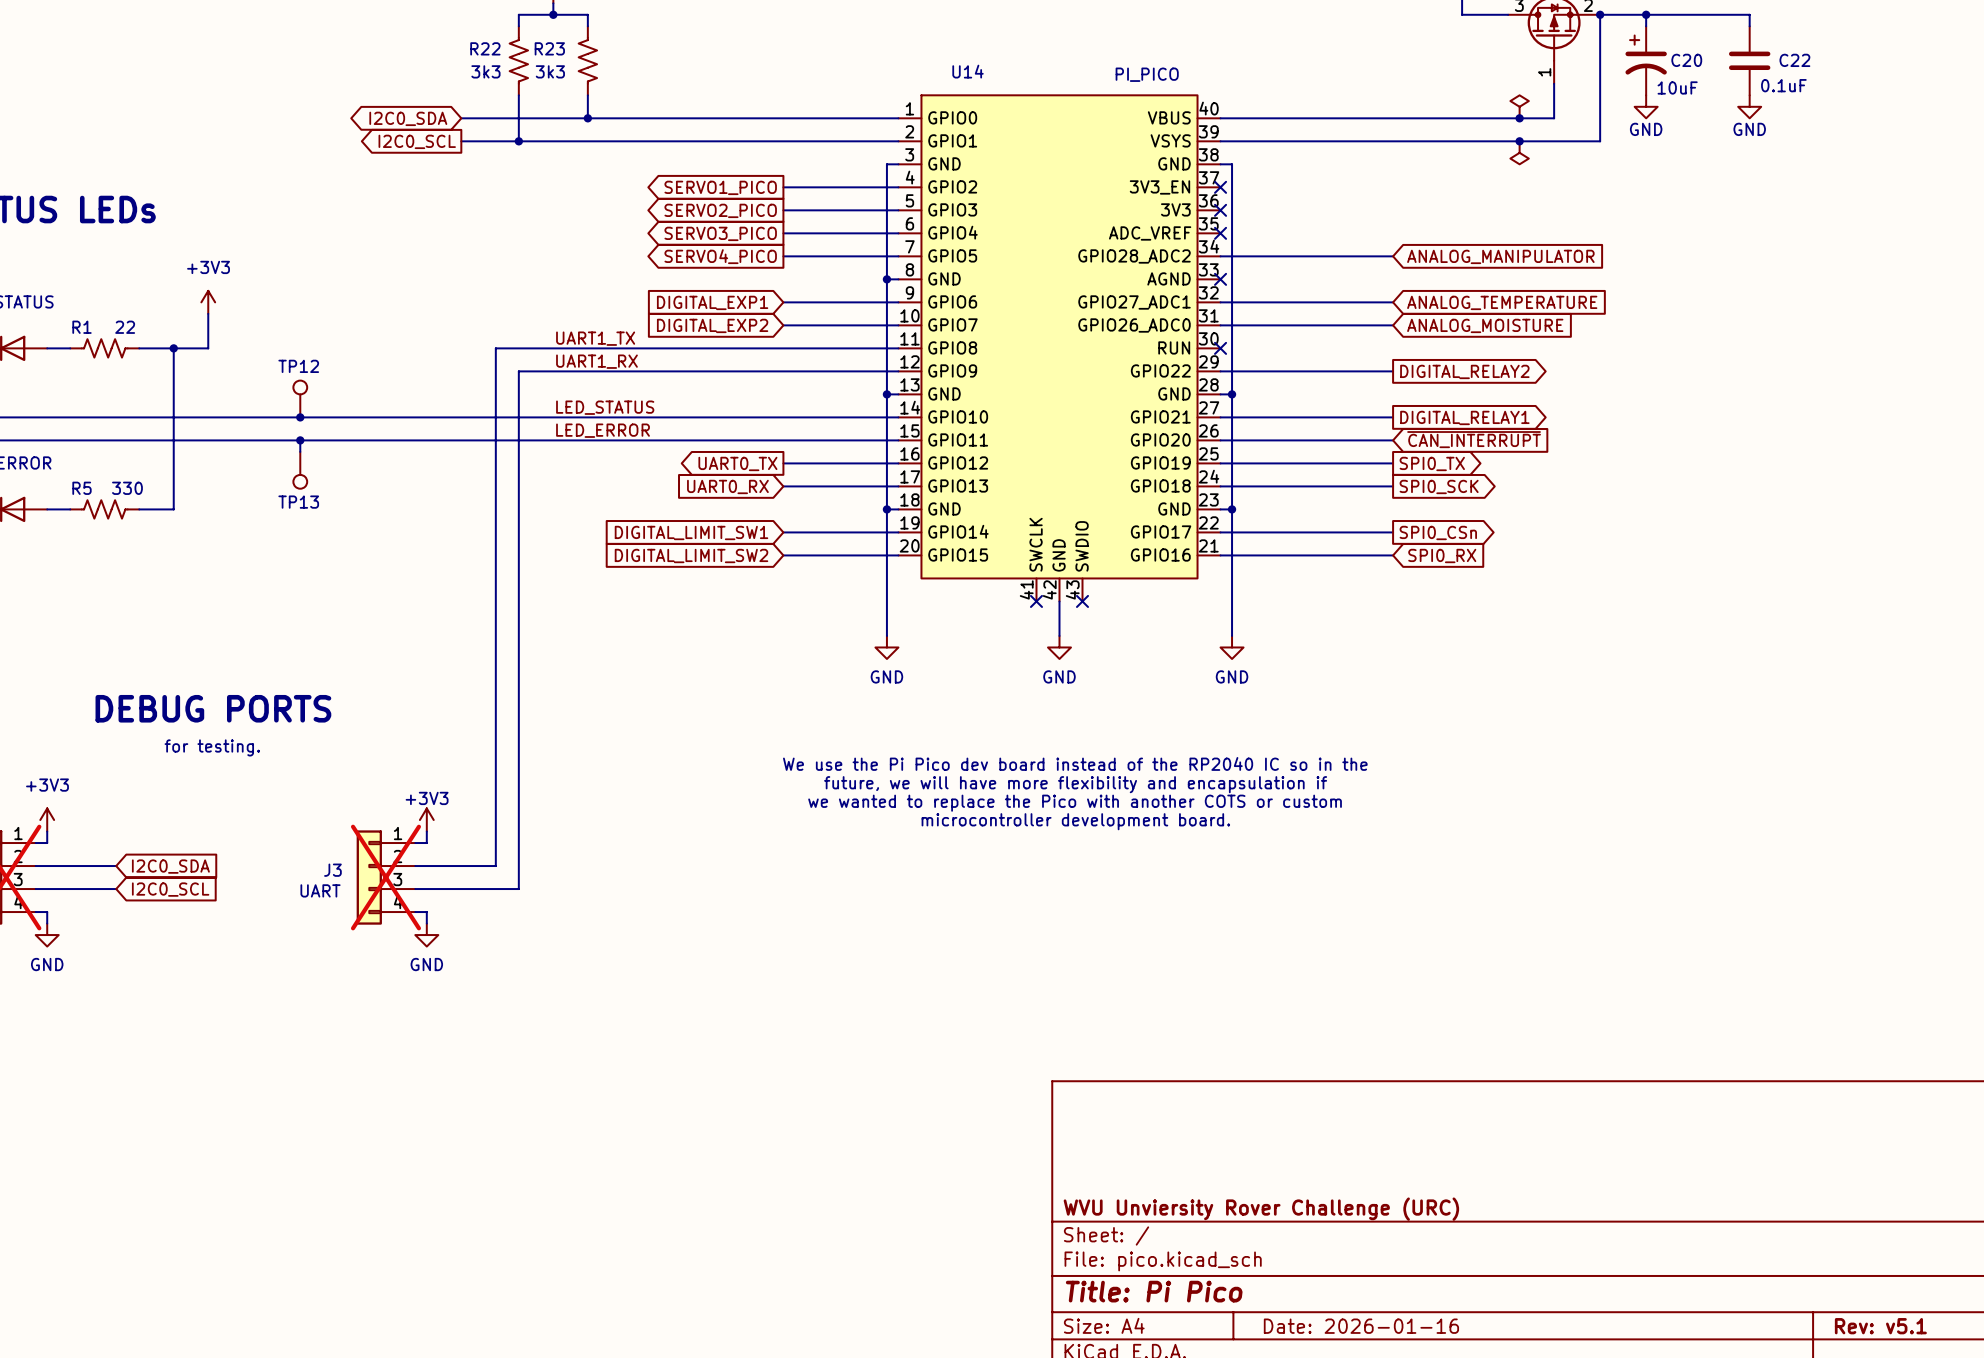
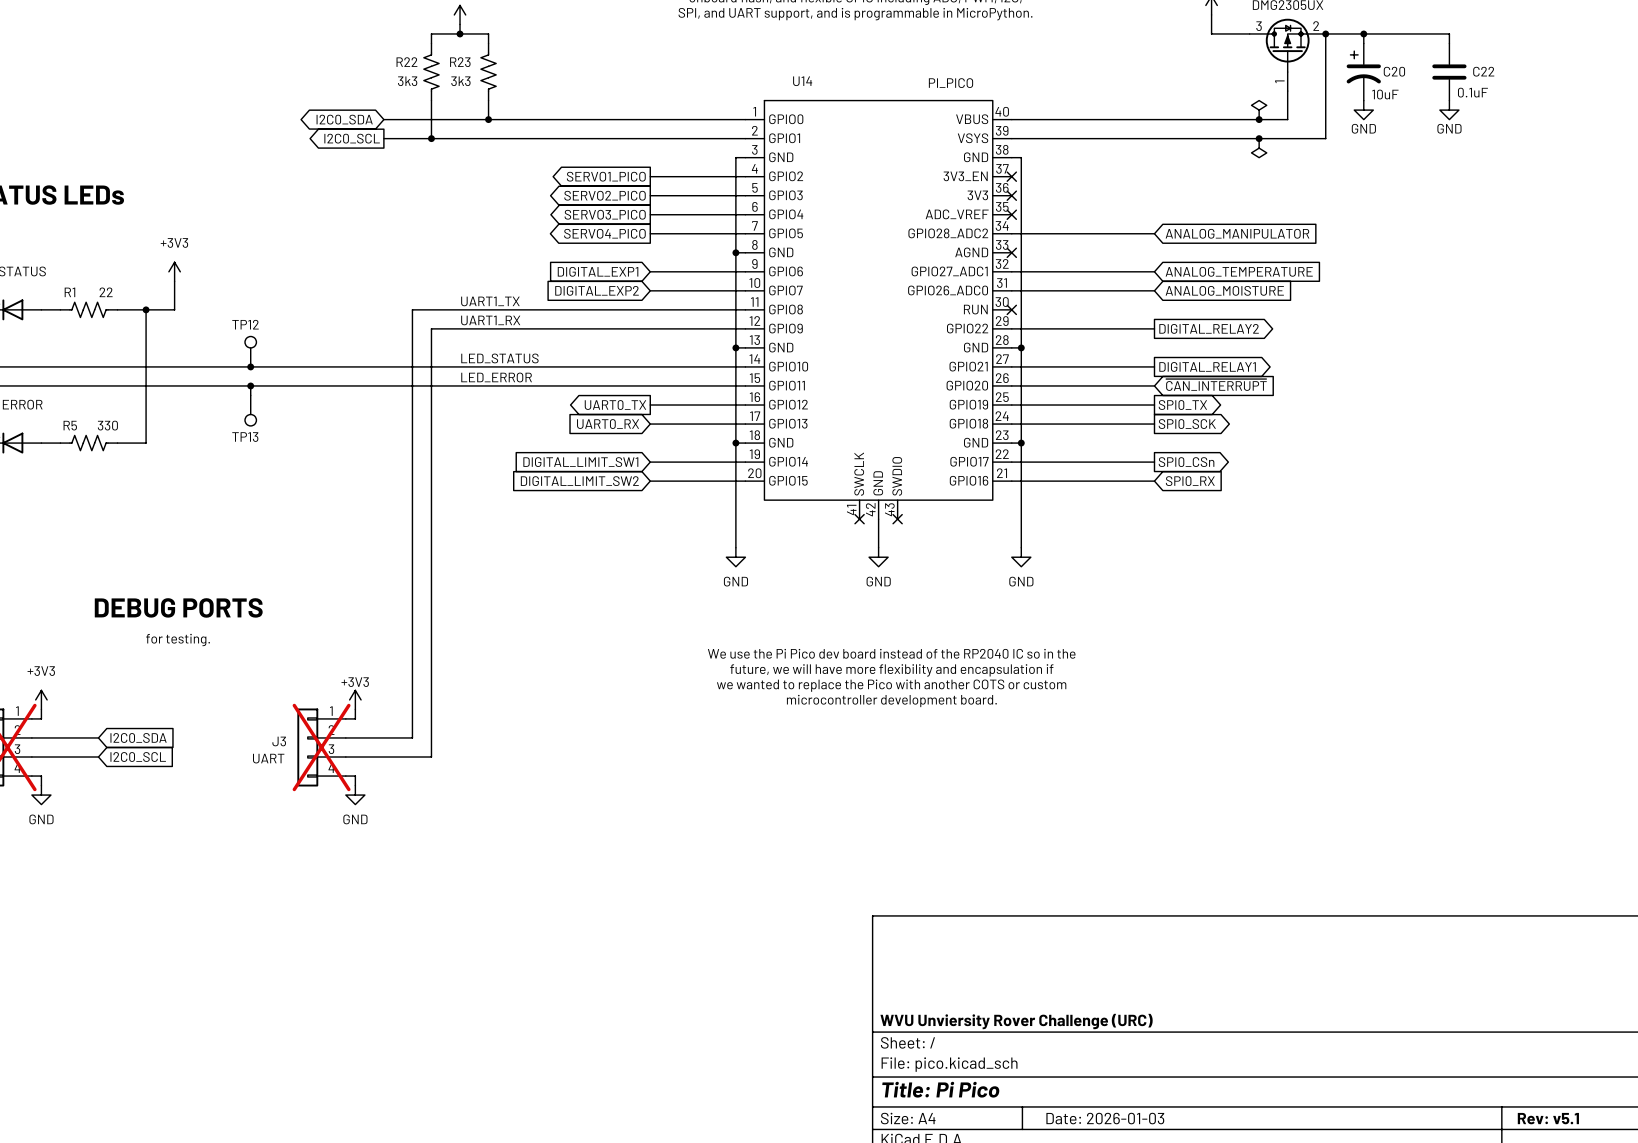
title block: Date: 2026-01-16 (1361, 1326) -> Date: 2026-01-03 (1105, 1118)

